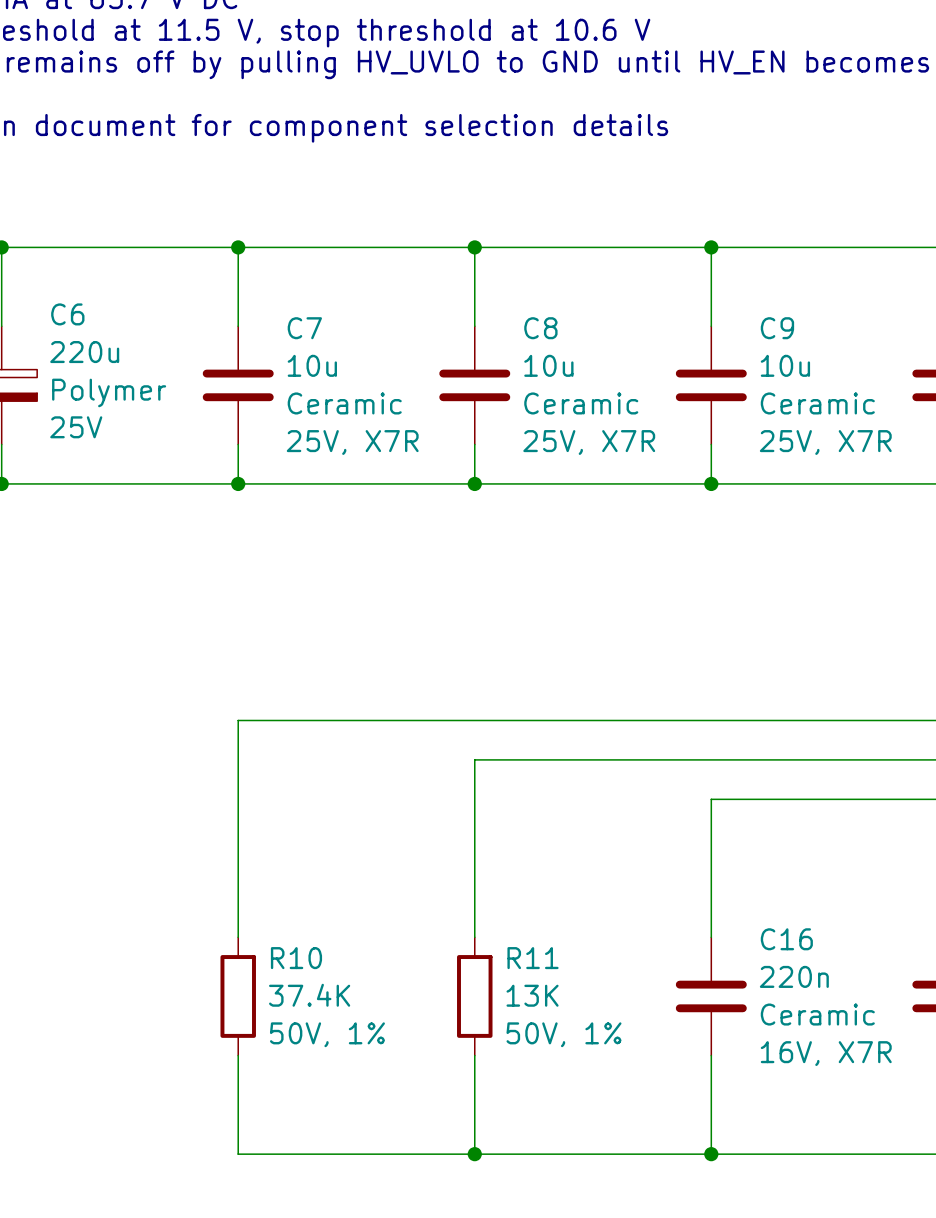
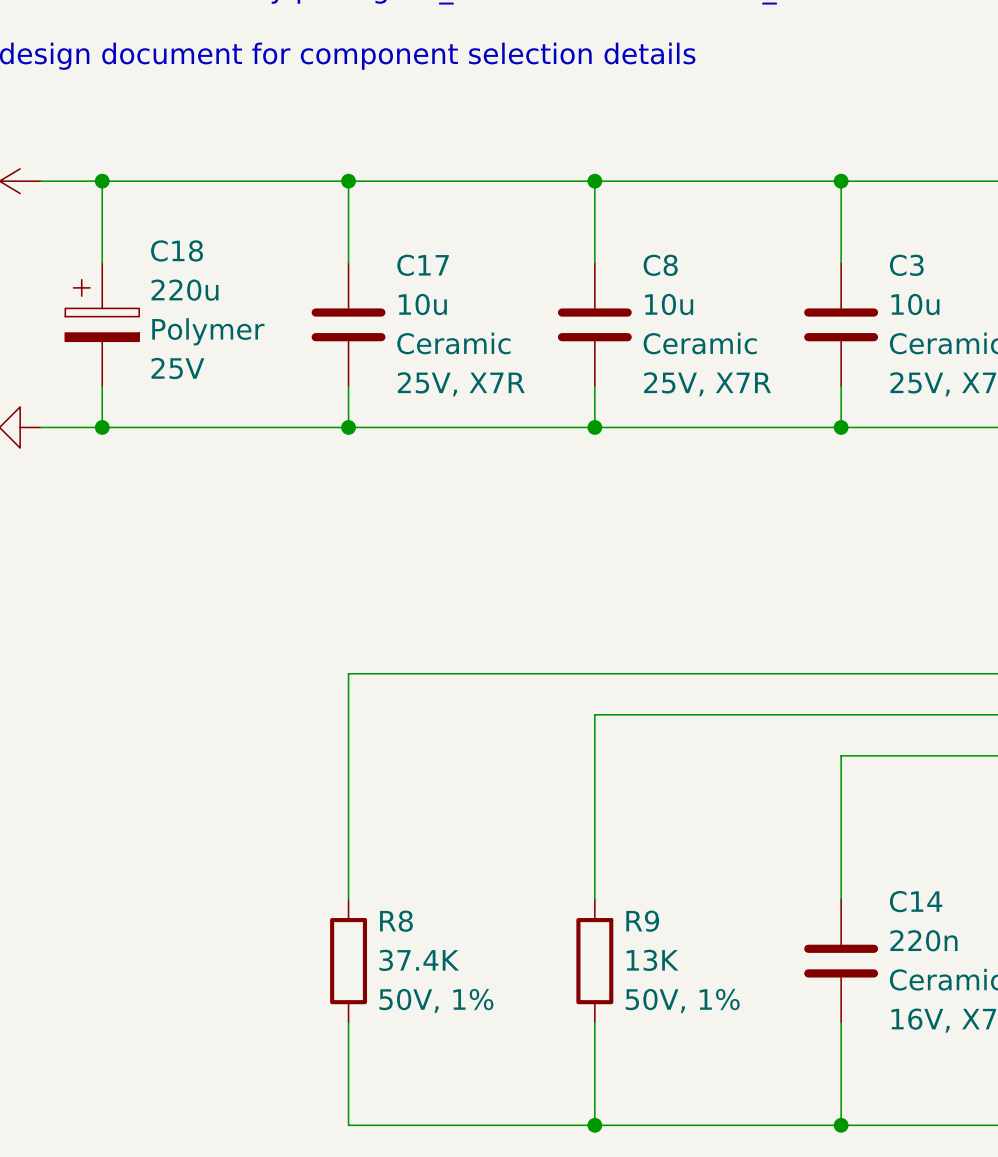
C6 name: C6 (67, 314) -> C18 (177, 250)
C7 name: C7 (304, 328) -> C17 (423, 265)
C9 name: C9 (777, 328) -> C3 (906, 265)
C16 name: C16 (786, 939) -> C14 (916, 901)
R10 name: R10 (296, 958) -> R8 (396, 921)
R11 name: R11 (533, 958) -> R9 (642, 921)

